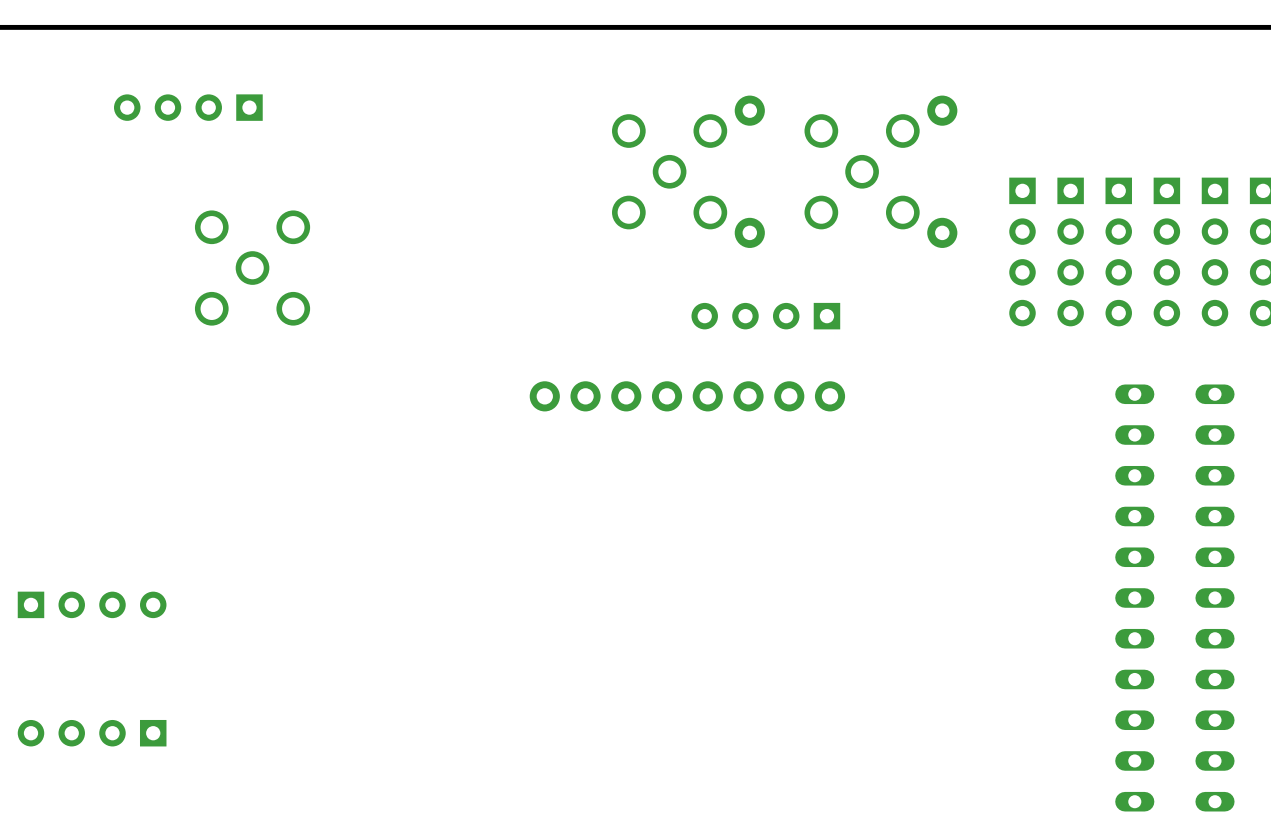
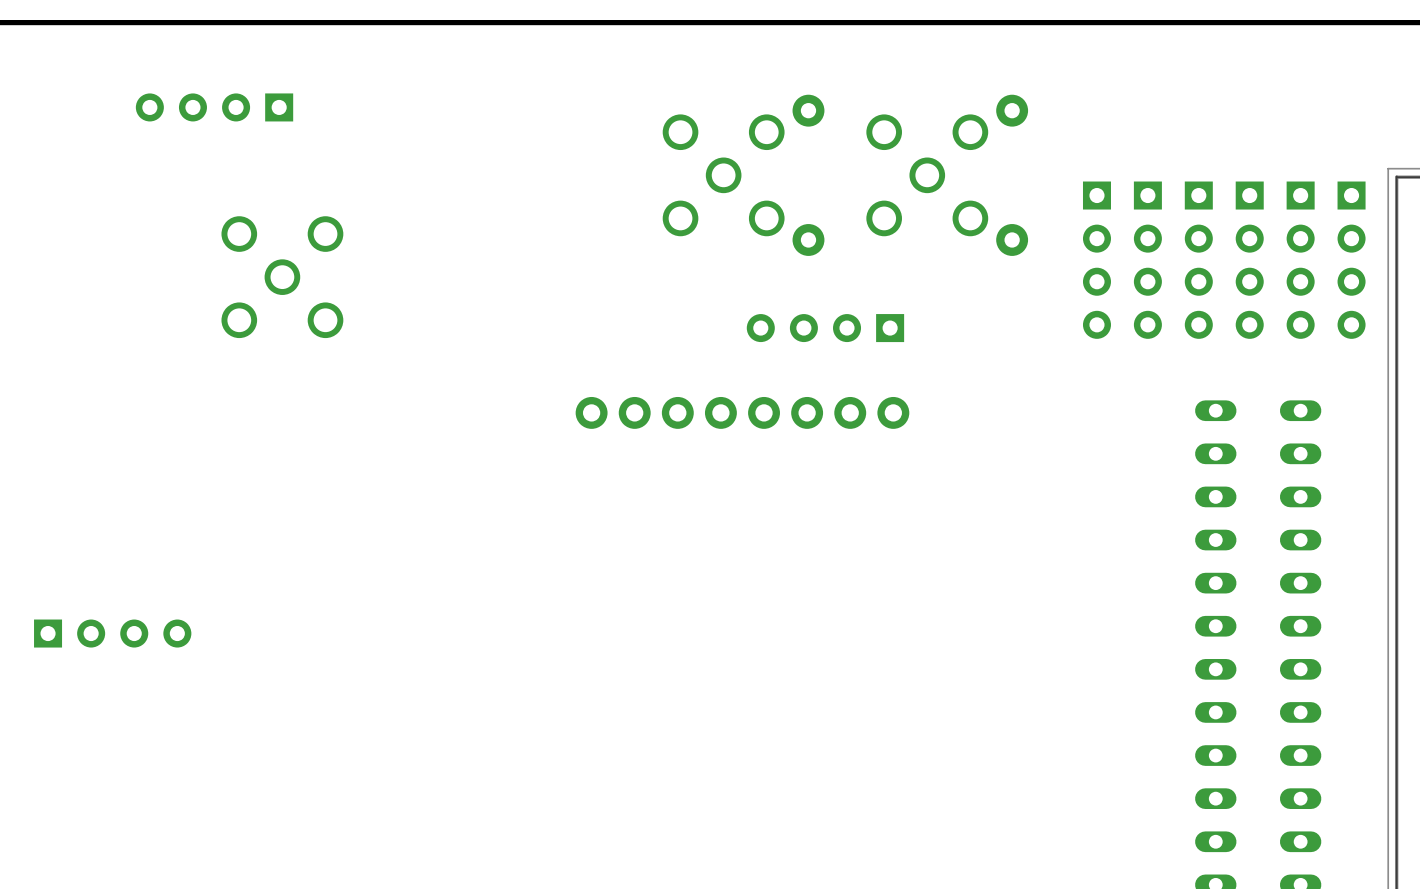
part: (92, 733) -> none

